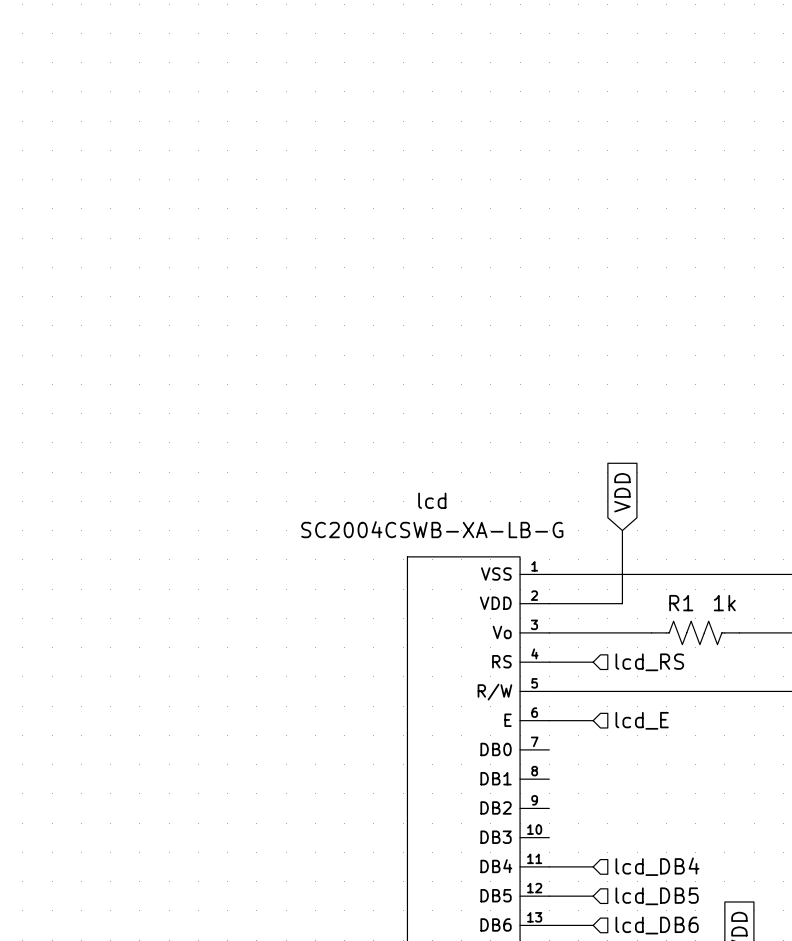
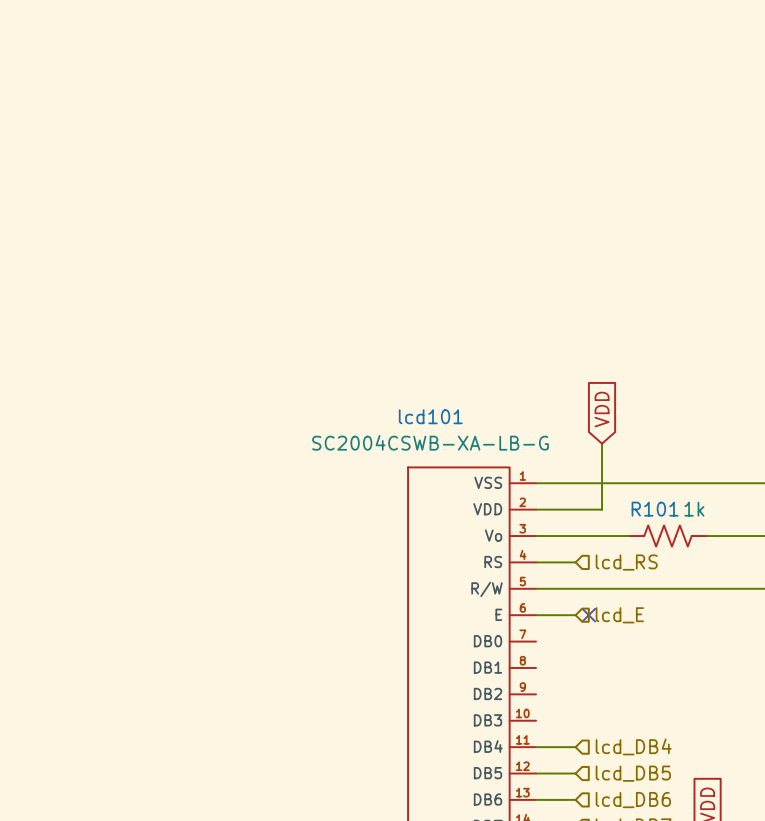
lcd name: lcd (432, 500) -> lcd101 (430, 416)
R1 name: R1 (681, 603) -> R101 (655, 509)
no-connect mark: none -> (588, 615)

